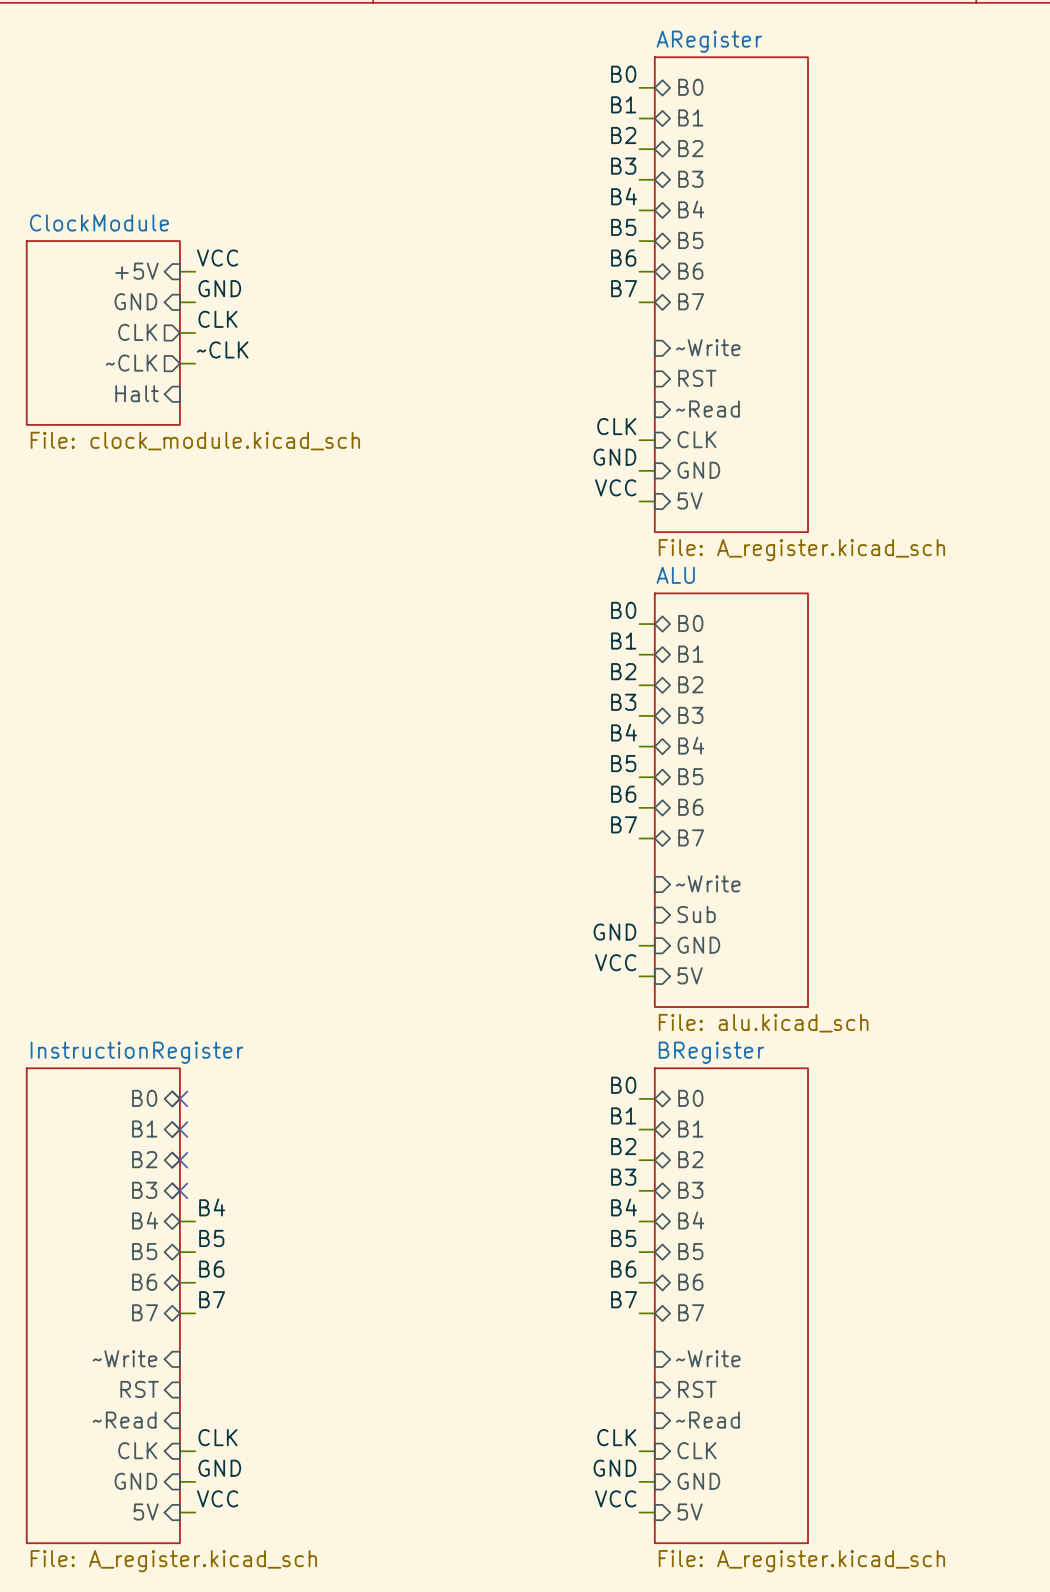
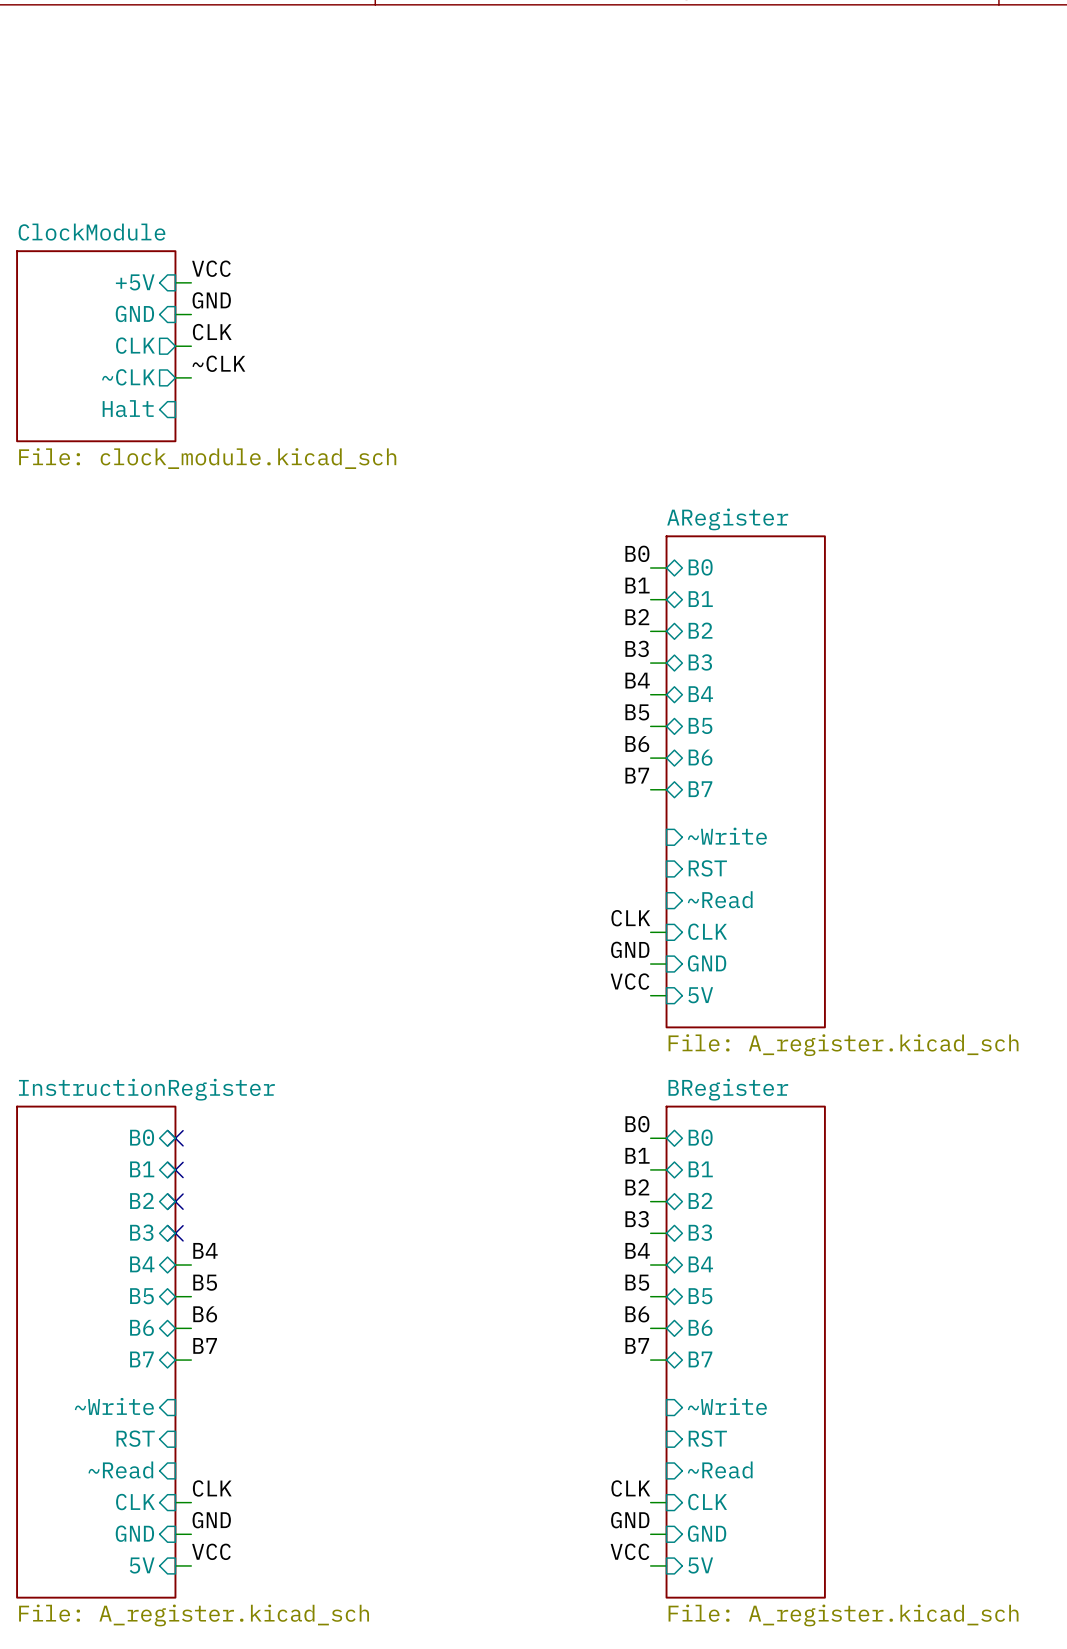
label: B0 (623, 74) -> none
wire: (639, 87) (654, 87) -> none
sheet pin: B0 (690, 87) -> none
label: B1 (623, 104) -> none
sheet pin: B1 (690, 117) -> none
wire: (639, 118) (654, 118) -> none
label: B2 (623, 135) -> none
sheet pin: B2 (690, 148) -> none
wire: (639, 149) (654, 149) -> none
label: B3 (623, 166) -> none
wire: (639, 179) (654, 179) -> none
sheet pin: B3 (690, 179) -> none
label: B4 (624, 196) -> none
sheet pin: B4 (691, 209) -> none
wire: (639, 210) (654, 210) -> none
label: B5 (623, 227) -> none
sheet pin: B5 (690, 240) -> none
wire: (639, 241) (654, 241) -> none
label: B6 (623, 258) -> none
wire: (639, 271) (654, 271) -> none
sheet pin: B6 (690, 271) -> none
label: B7 (624, 288) -> none
sheet ARegister: File: A_register.kicad_sch (731, 294) -> none
sheet pin: B7 (691, 301) -> none
wire: (639, 302) (654, 302) -> none
sheet pin: ~Write (708, 347) -> none
sheet pin: RST (697, 378) -> none
sheet pin: ~Read (707, 409) -> none
label: CLK (616, 426) -> none
sheet pin: CLK (697, 439) -> none
wire: (639, 440) (654, 440) -> none
label: GND (614, 457) -> none
wire: (639, 470) (654, 470) -> none
sheet pin: GND (698, 470) -> none
label: VCC (615, 487) -> none
sheet pin: 5V (690, 500) -> none
wire: (639, 501) (654, 501) -> (650, 568) (666, 568)
label position: B0 (623, 610) -> B0 (637, 553)
sheet pin position: B0 (690, 623) -> B0 (700, 567)
wire: (639, 624) (654, 624) -> (650, 599) (666, 599)
label position: B1 (623, 641) -> B1 (637, 585)
wire: (639, 654) (654, 654) -> (650, 631) (666, 631)
sheet pin position: B1 (690, 654) -> B1 (700, 599)
label position: B2 (623, 671) -> B2 (637, 617)
sheet pin position: B2 (690, 684) -> B2 (700, 630)
wire: (639, 685) (654, 685) -> (650, 663) (666, 663)
label position: B3 (623, 702) -> B3 (637, 648)
wire: (639, 715) (654, 715) -> (650, 694) (666, 694)
sheet pin position: B3 (690, 715) -> B3 (700, 662)
sheet pin: none -> B6 (700, 757)
label position: B4 (624, 732) -> B4 (637, 680)
sheet pin position: B4 (691, 745) -> B4 (700, 694)
wire: (639, 746) (654, 746) -> (650, 726) (666, 726)
sheet ARegister: none -> File: A_register.kicad_sch (745, 781)
sheet pin: none -> B7 (700, 789)
label position: B5 (623, 763) -> B5 (637, 712)
sheet pin position: B5 (690, 776) -> B5 (700, 725)
wire: (639, 777) (654, 777) -> (650, 758) (666, 758)
label position: B6 (623, 794) -> B6 (637, 744)
sheet ALU: File: alu.kicad_sch (731, 800) -> none
wire: (639, 807) (654, 807) -> (650, 789) (666, 789)
sheet pin shape: bidirectional (690, 807) -> input (727, 836)
sheet pin: B6 (690, 807) -> ~Write (727, 836)
label position: B7 (624, 824) -> B7 (637, 775)
sheet pin shape: bidirectional (691, 837) -> input (707, 868)
sheet pin: B7 (691, 837) -> RST (707, 868)
wire: (639, 838) (654, 838) -> (650, 995) (666, 995)
sheet pin: none -> ~Read (720, 899)
sheet pin: ~Write (708, 883) -> none
label: none -> CLK (630, 918)
sheet pin: none -> CLK (707, 931)
sheet pin: Sub (696, 914) -> none
label position: GND (614, 932) -> GND (630, 949)
wire: (639, 945) (654, 945) -> (650, 932) (666, 932)
sheet pin position: GND (698, 945) -> GND (707, 963)
label position: VCC (615, 962) -> VCC (629, 981)
sheet pin position: 5V (690, 975) -> 5V (700, 995)
wire: (639, 976) (654, 976) -> (650, 964) (666, 964)

